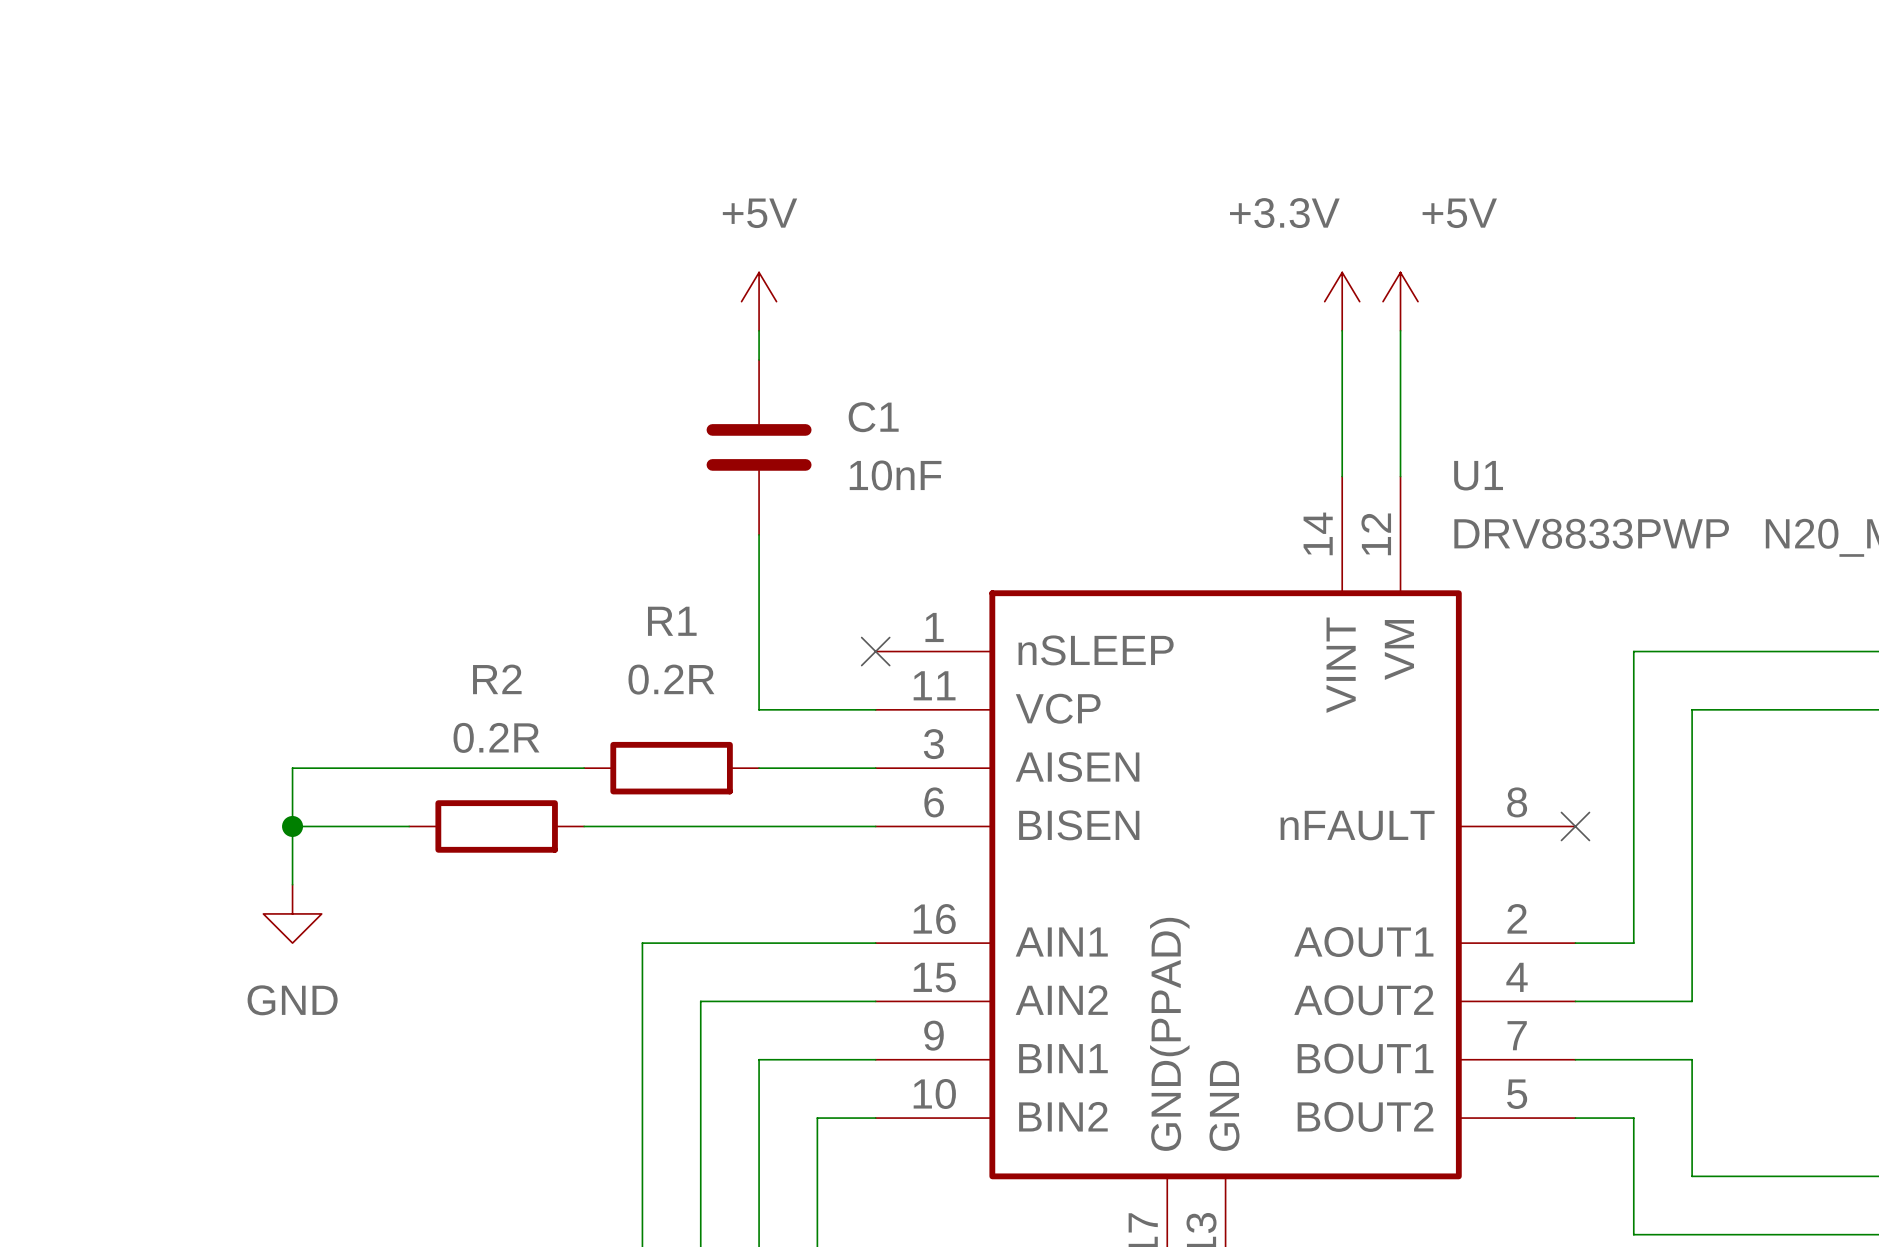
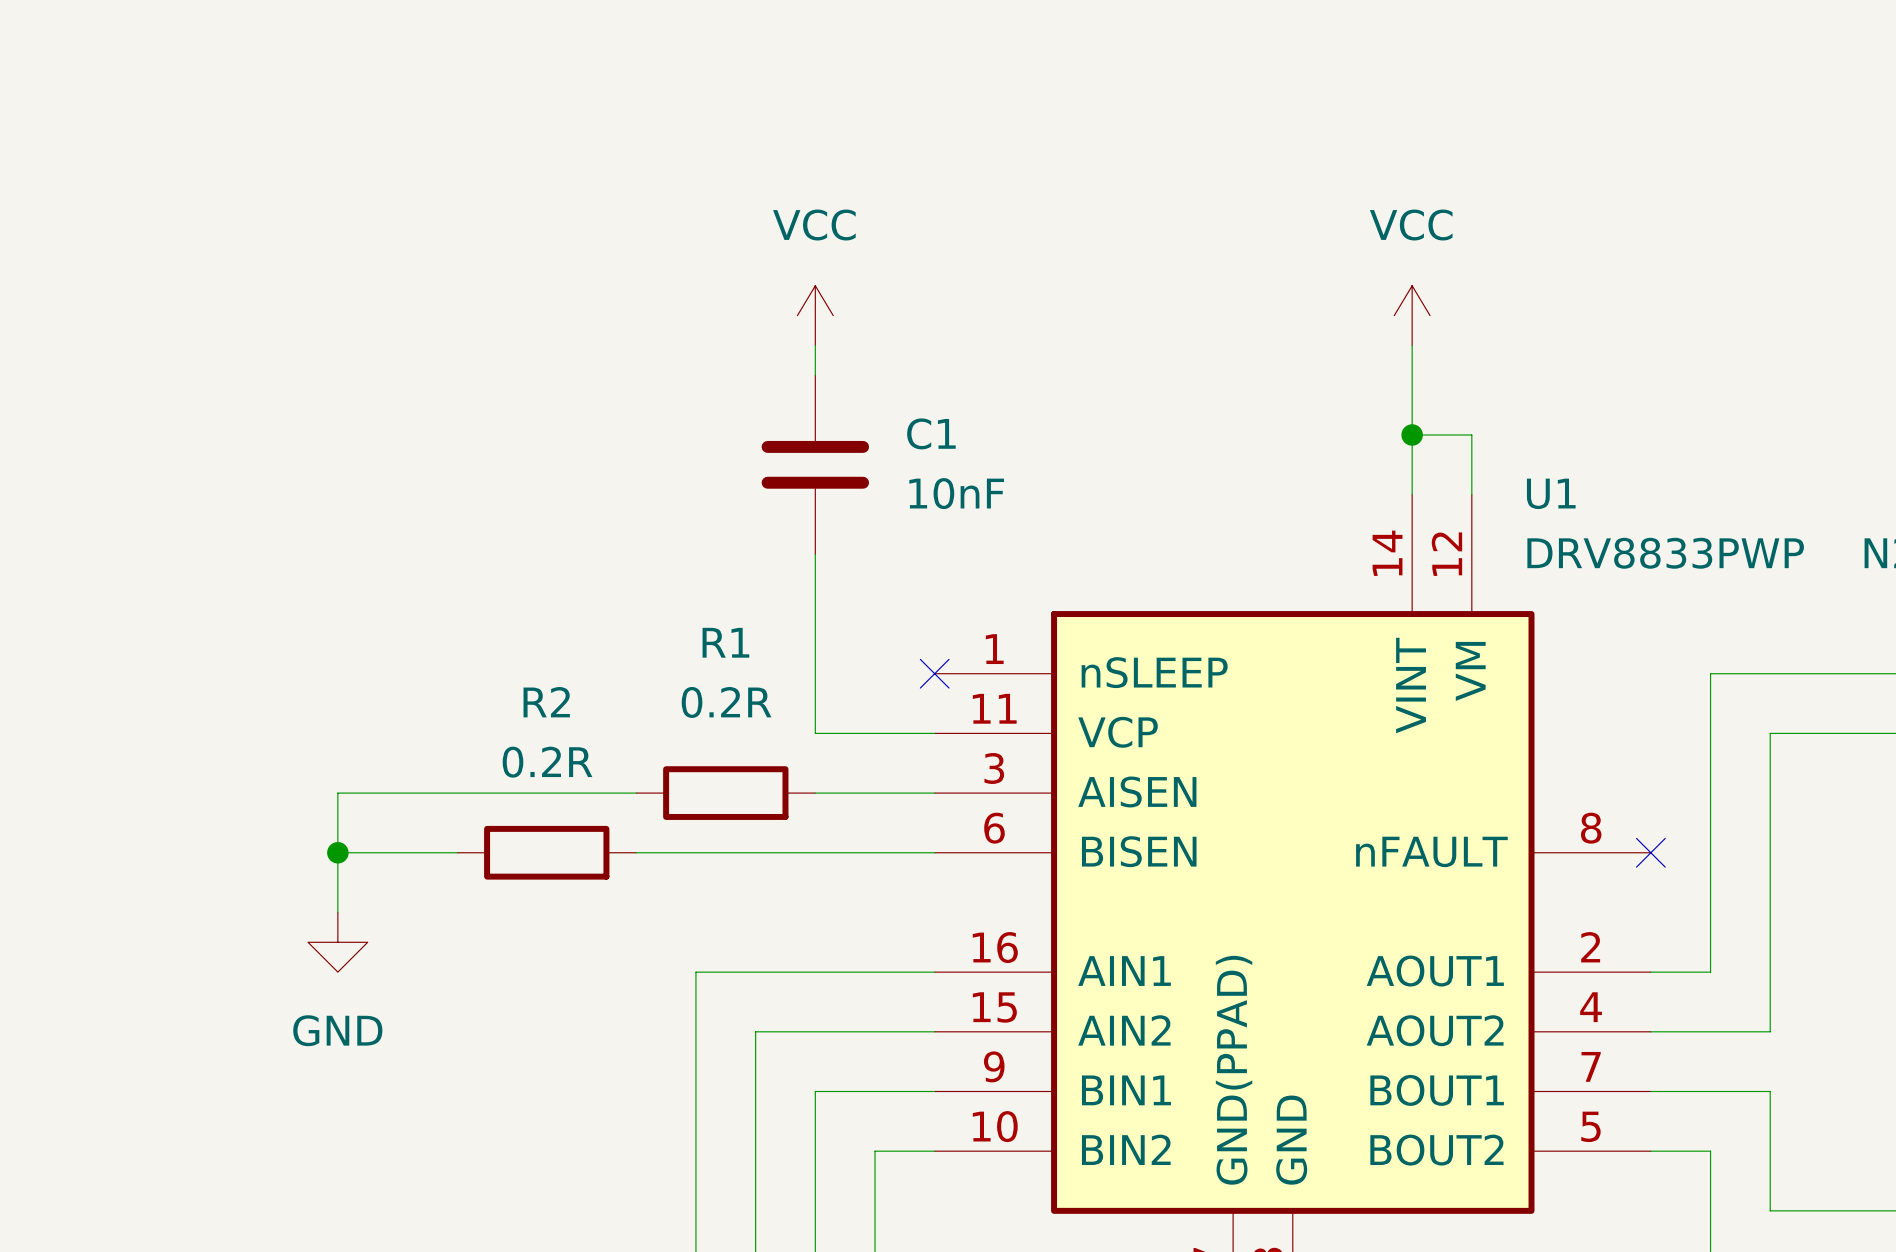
power symbol: +5V (759, 301) -> VCC (815, 315)
power symbol: +3.3V (1342, 301) -> VCC (1412, 315)
power symbol: +5V (1400, 301) -> none
wire: (1400, 330) (1400, 418) -> (1412, 434) (1471, 434)
junction: none -> (1412, 434)

